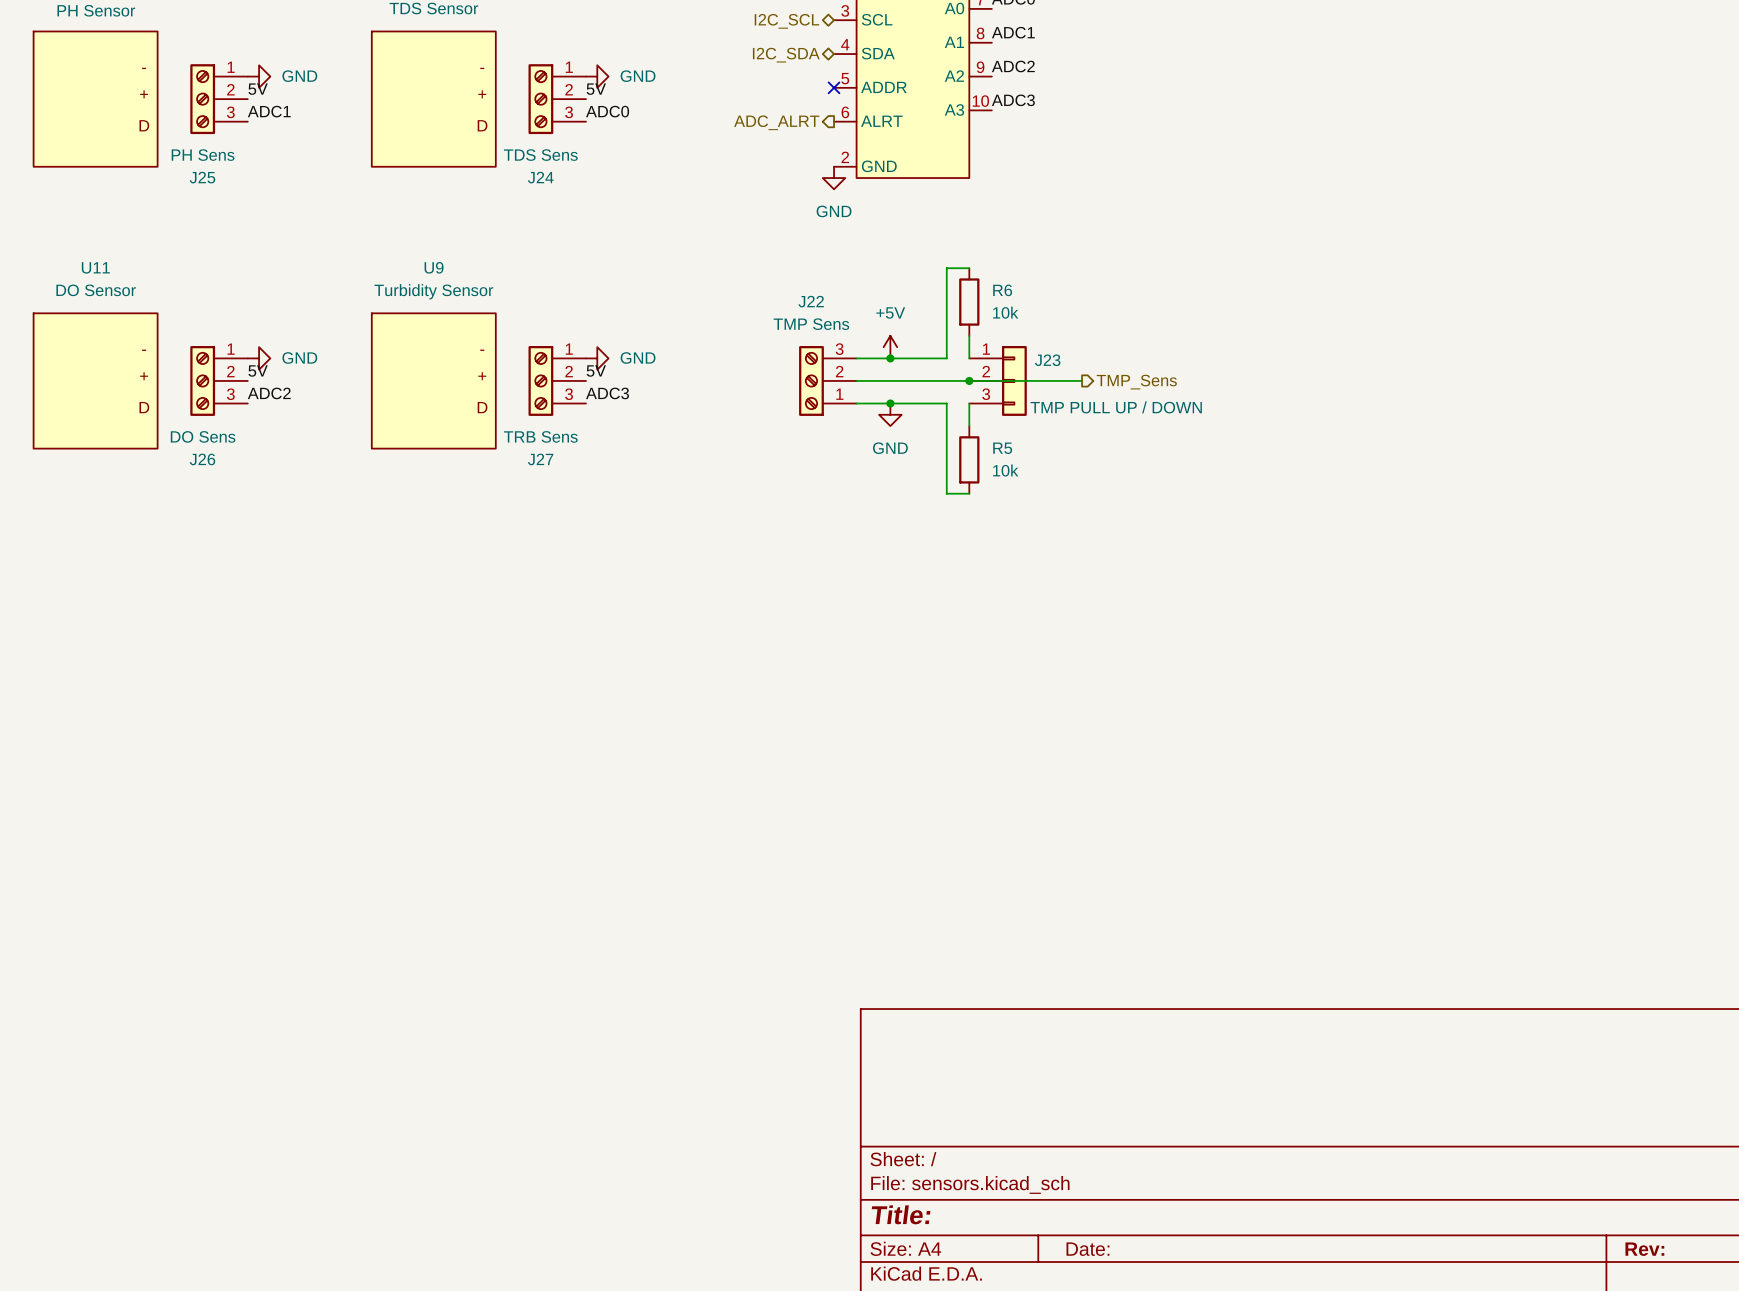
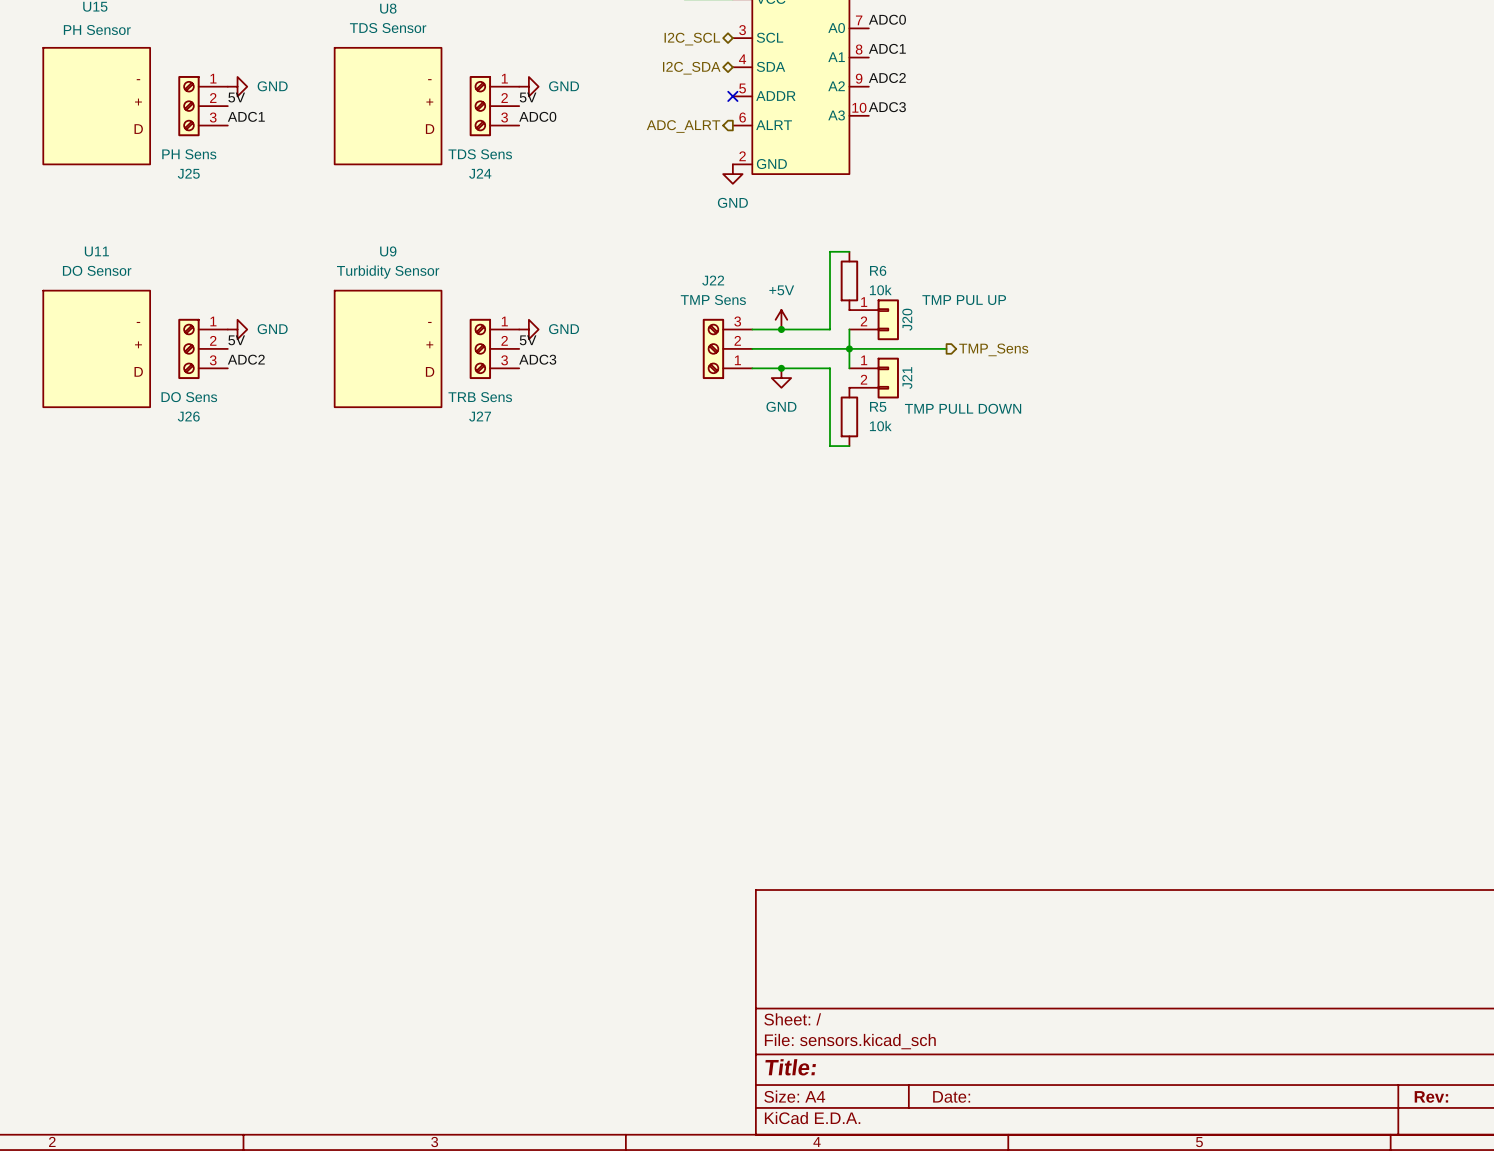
wire: (969, 335) (969, 358) -> (849, 368) (849, 329)
J20: none -> TMP PUL UP (874, 319)
J23: TMP PULL UP / DOWN (998, 380) -> none
wire: (969, 403) (969, 426) -> none
J21: none -> TMP PULL DOWN (874, 378)

